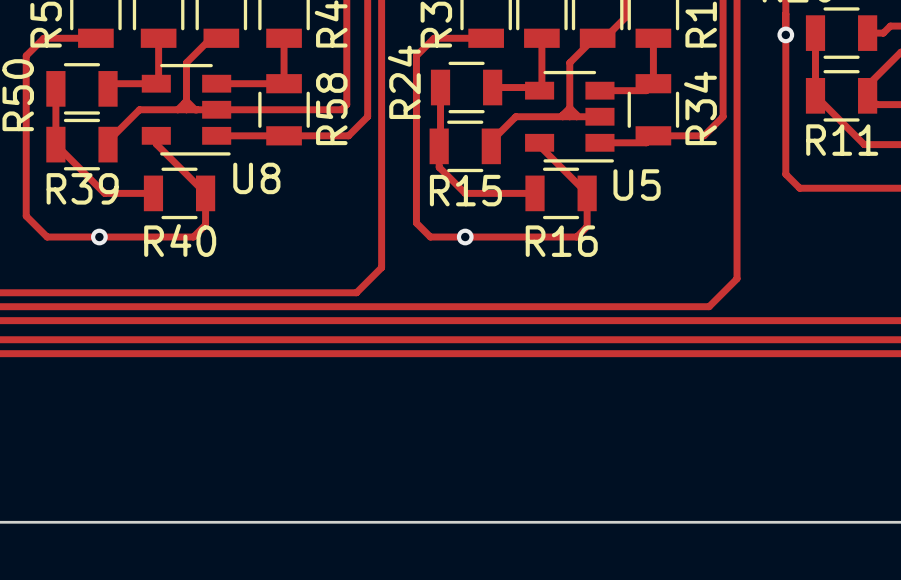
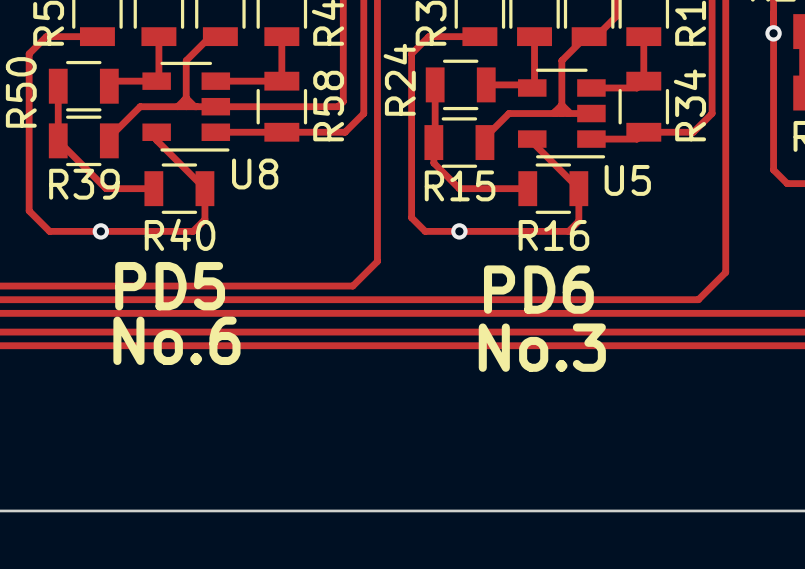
text: none -> PD5 (170, 286)
text: none -> PD6 (538, 289)
text: none -> No.6 (176, 340)
text: none -> No.3 (542, 347)

